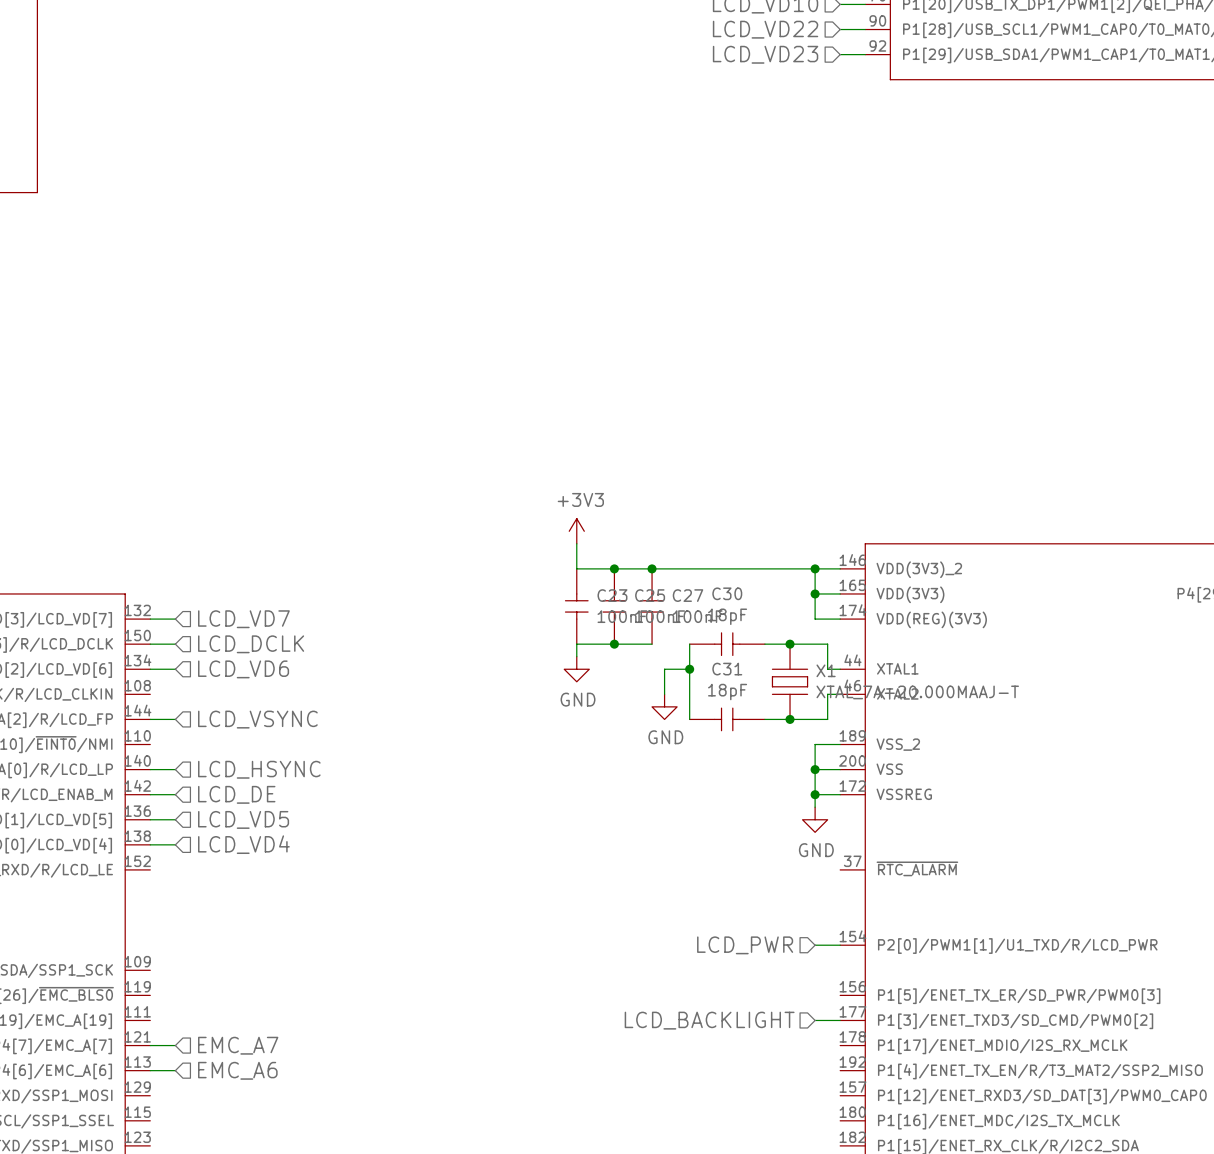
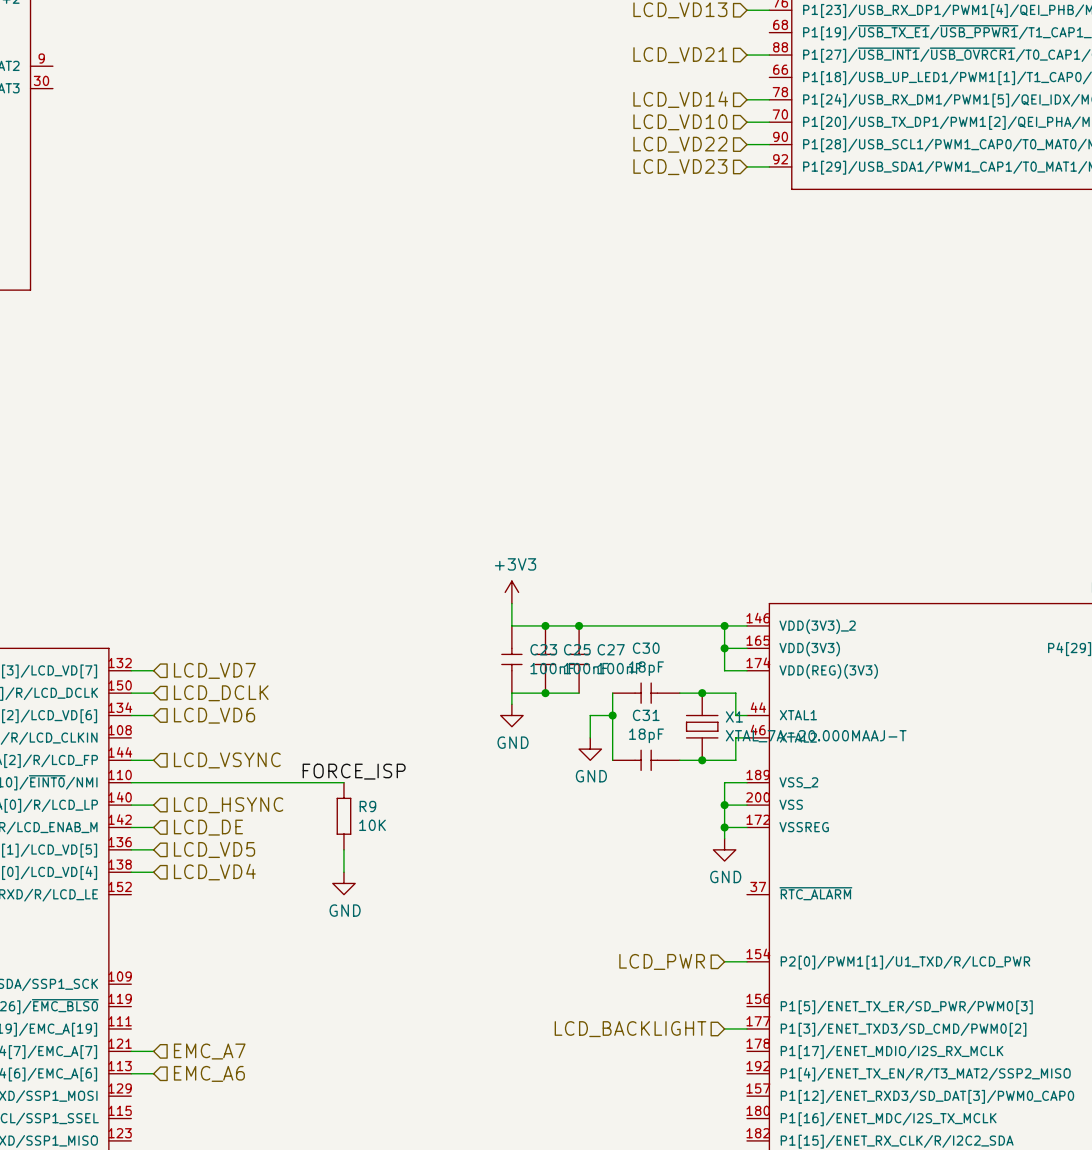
label: none -> FORCE_ISP (354, 771)
wire: none -> (131, 782) (343, 782)
R9: none -> 10K (343, 816)
wire: none -> (343, 849) (343, 872)
power symbol: none -> GND (343, 883)

